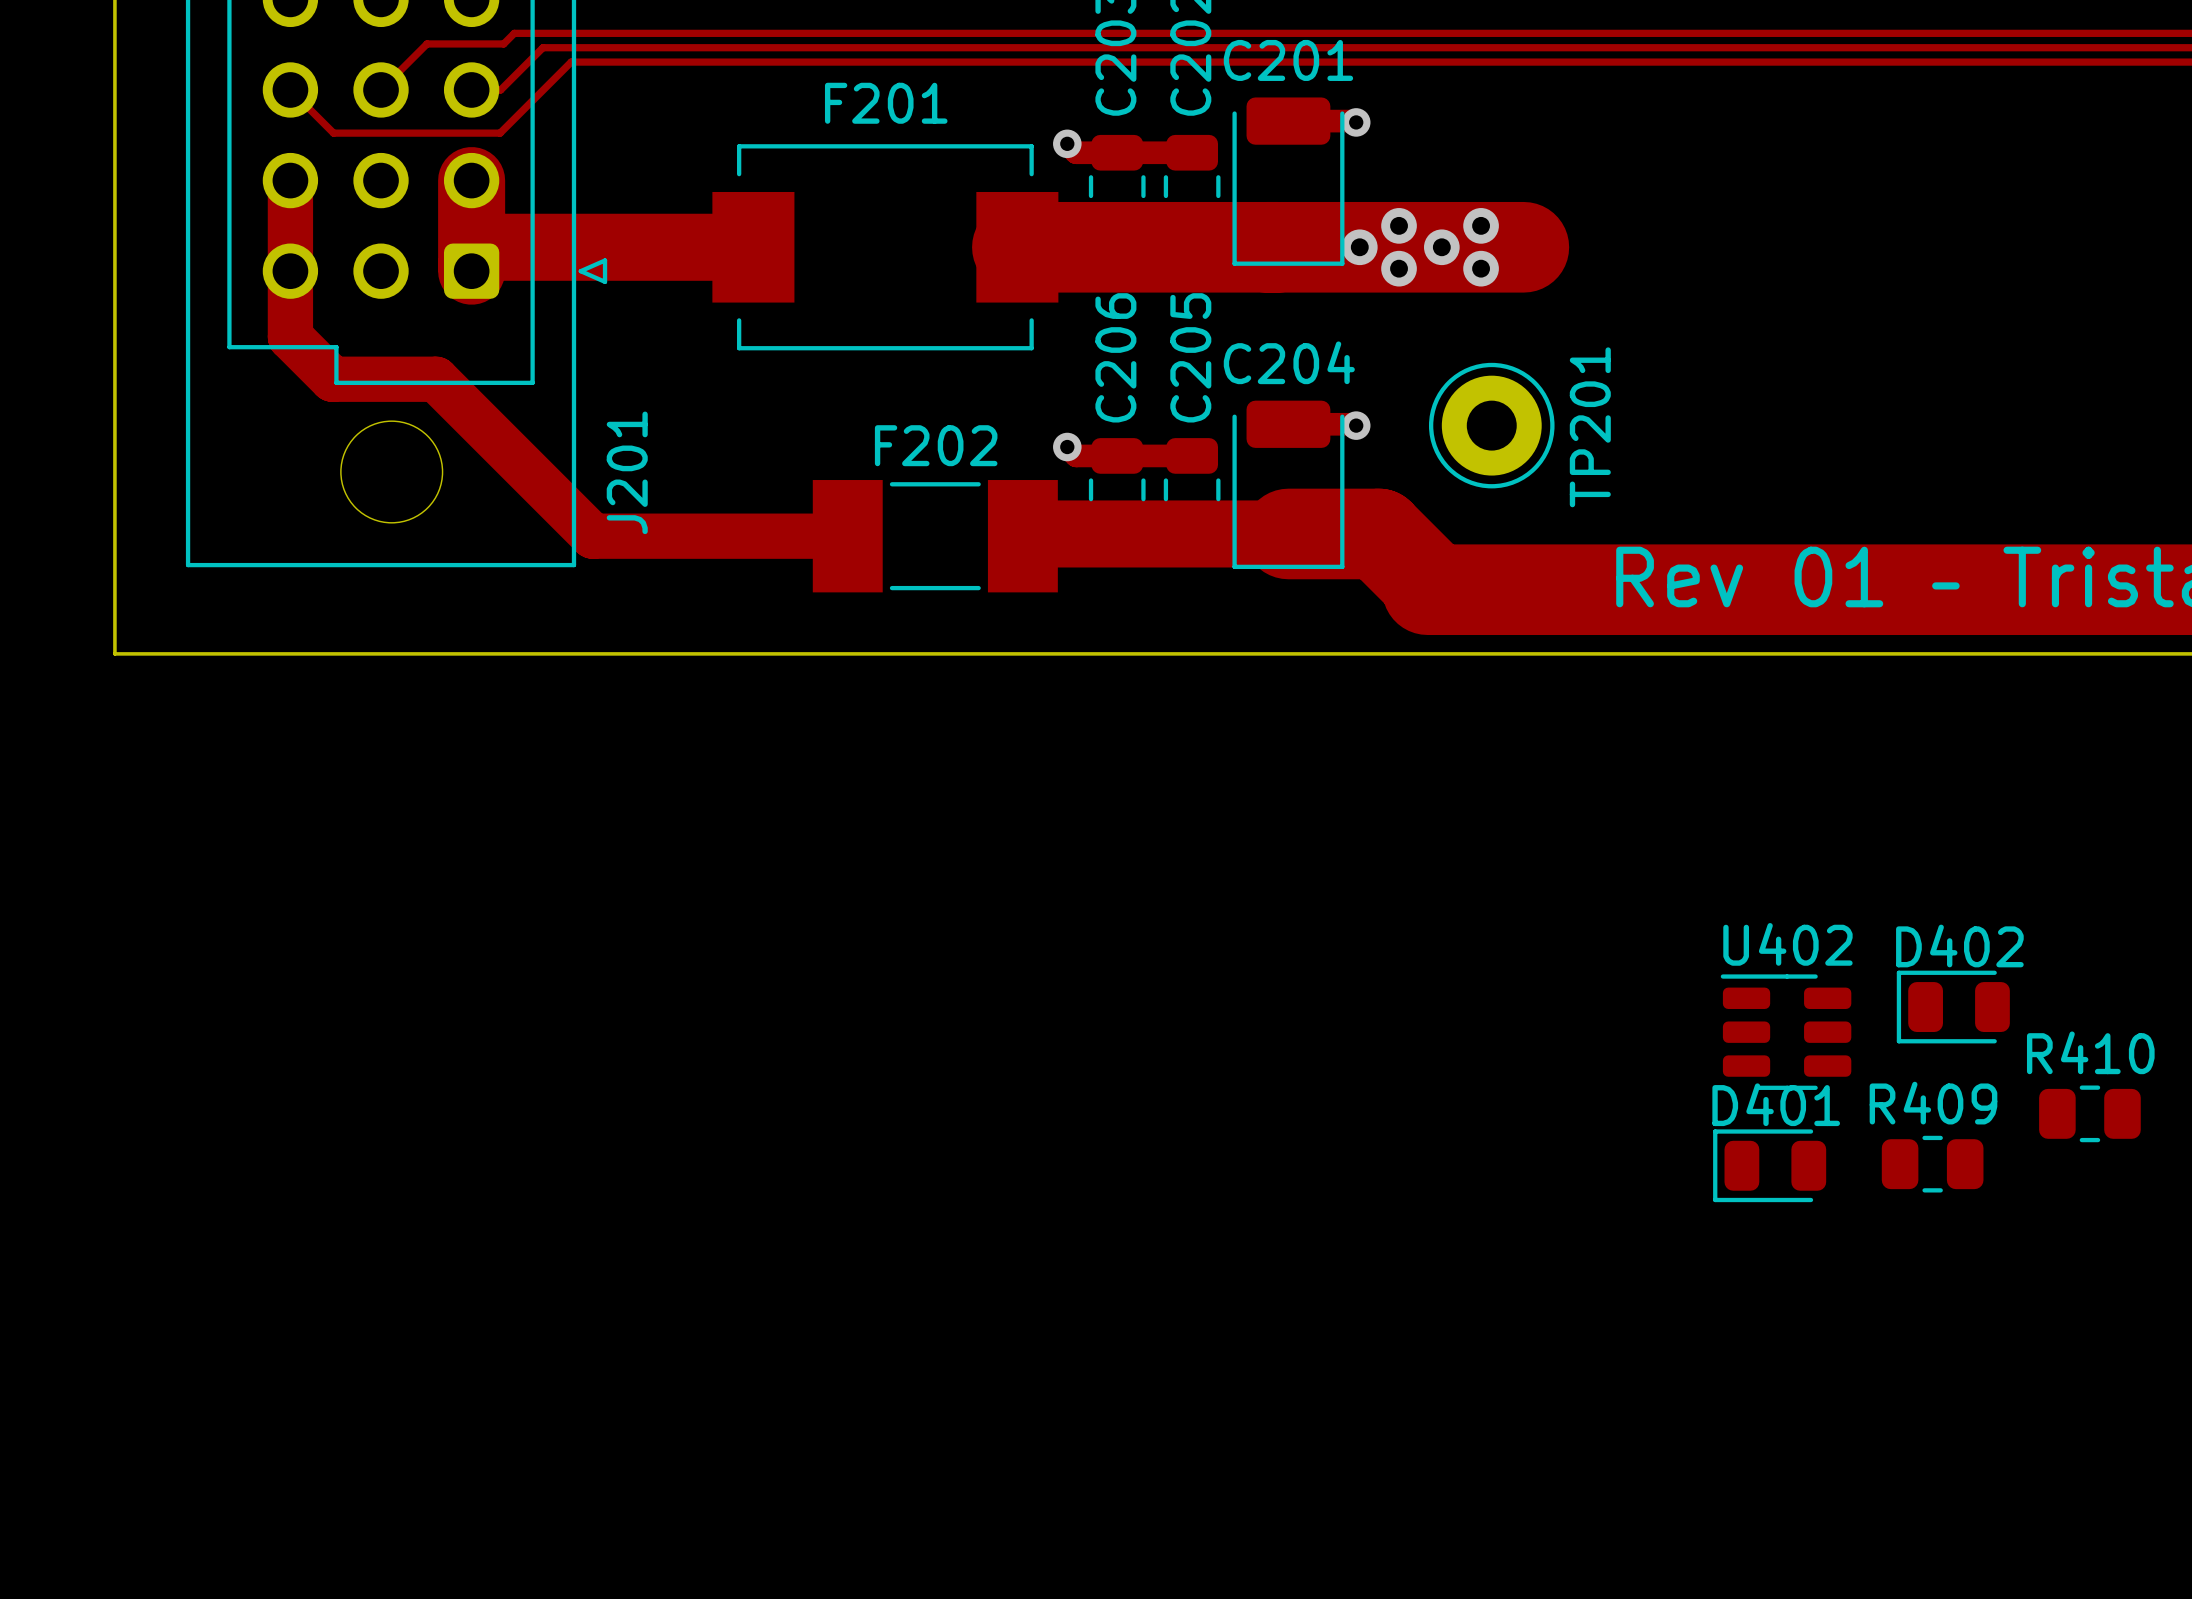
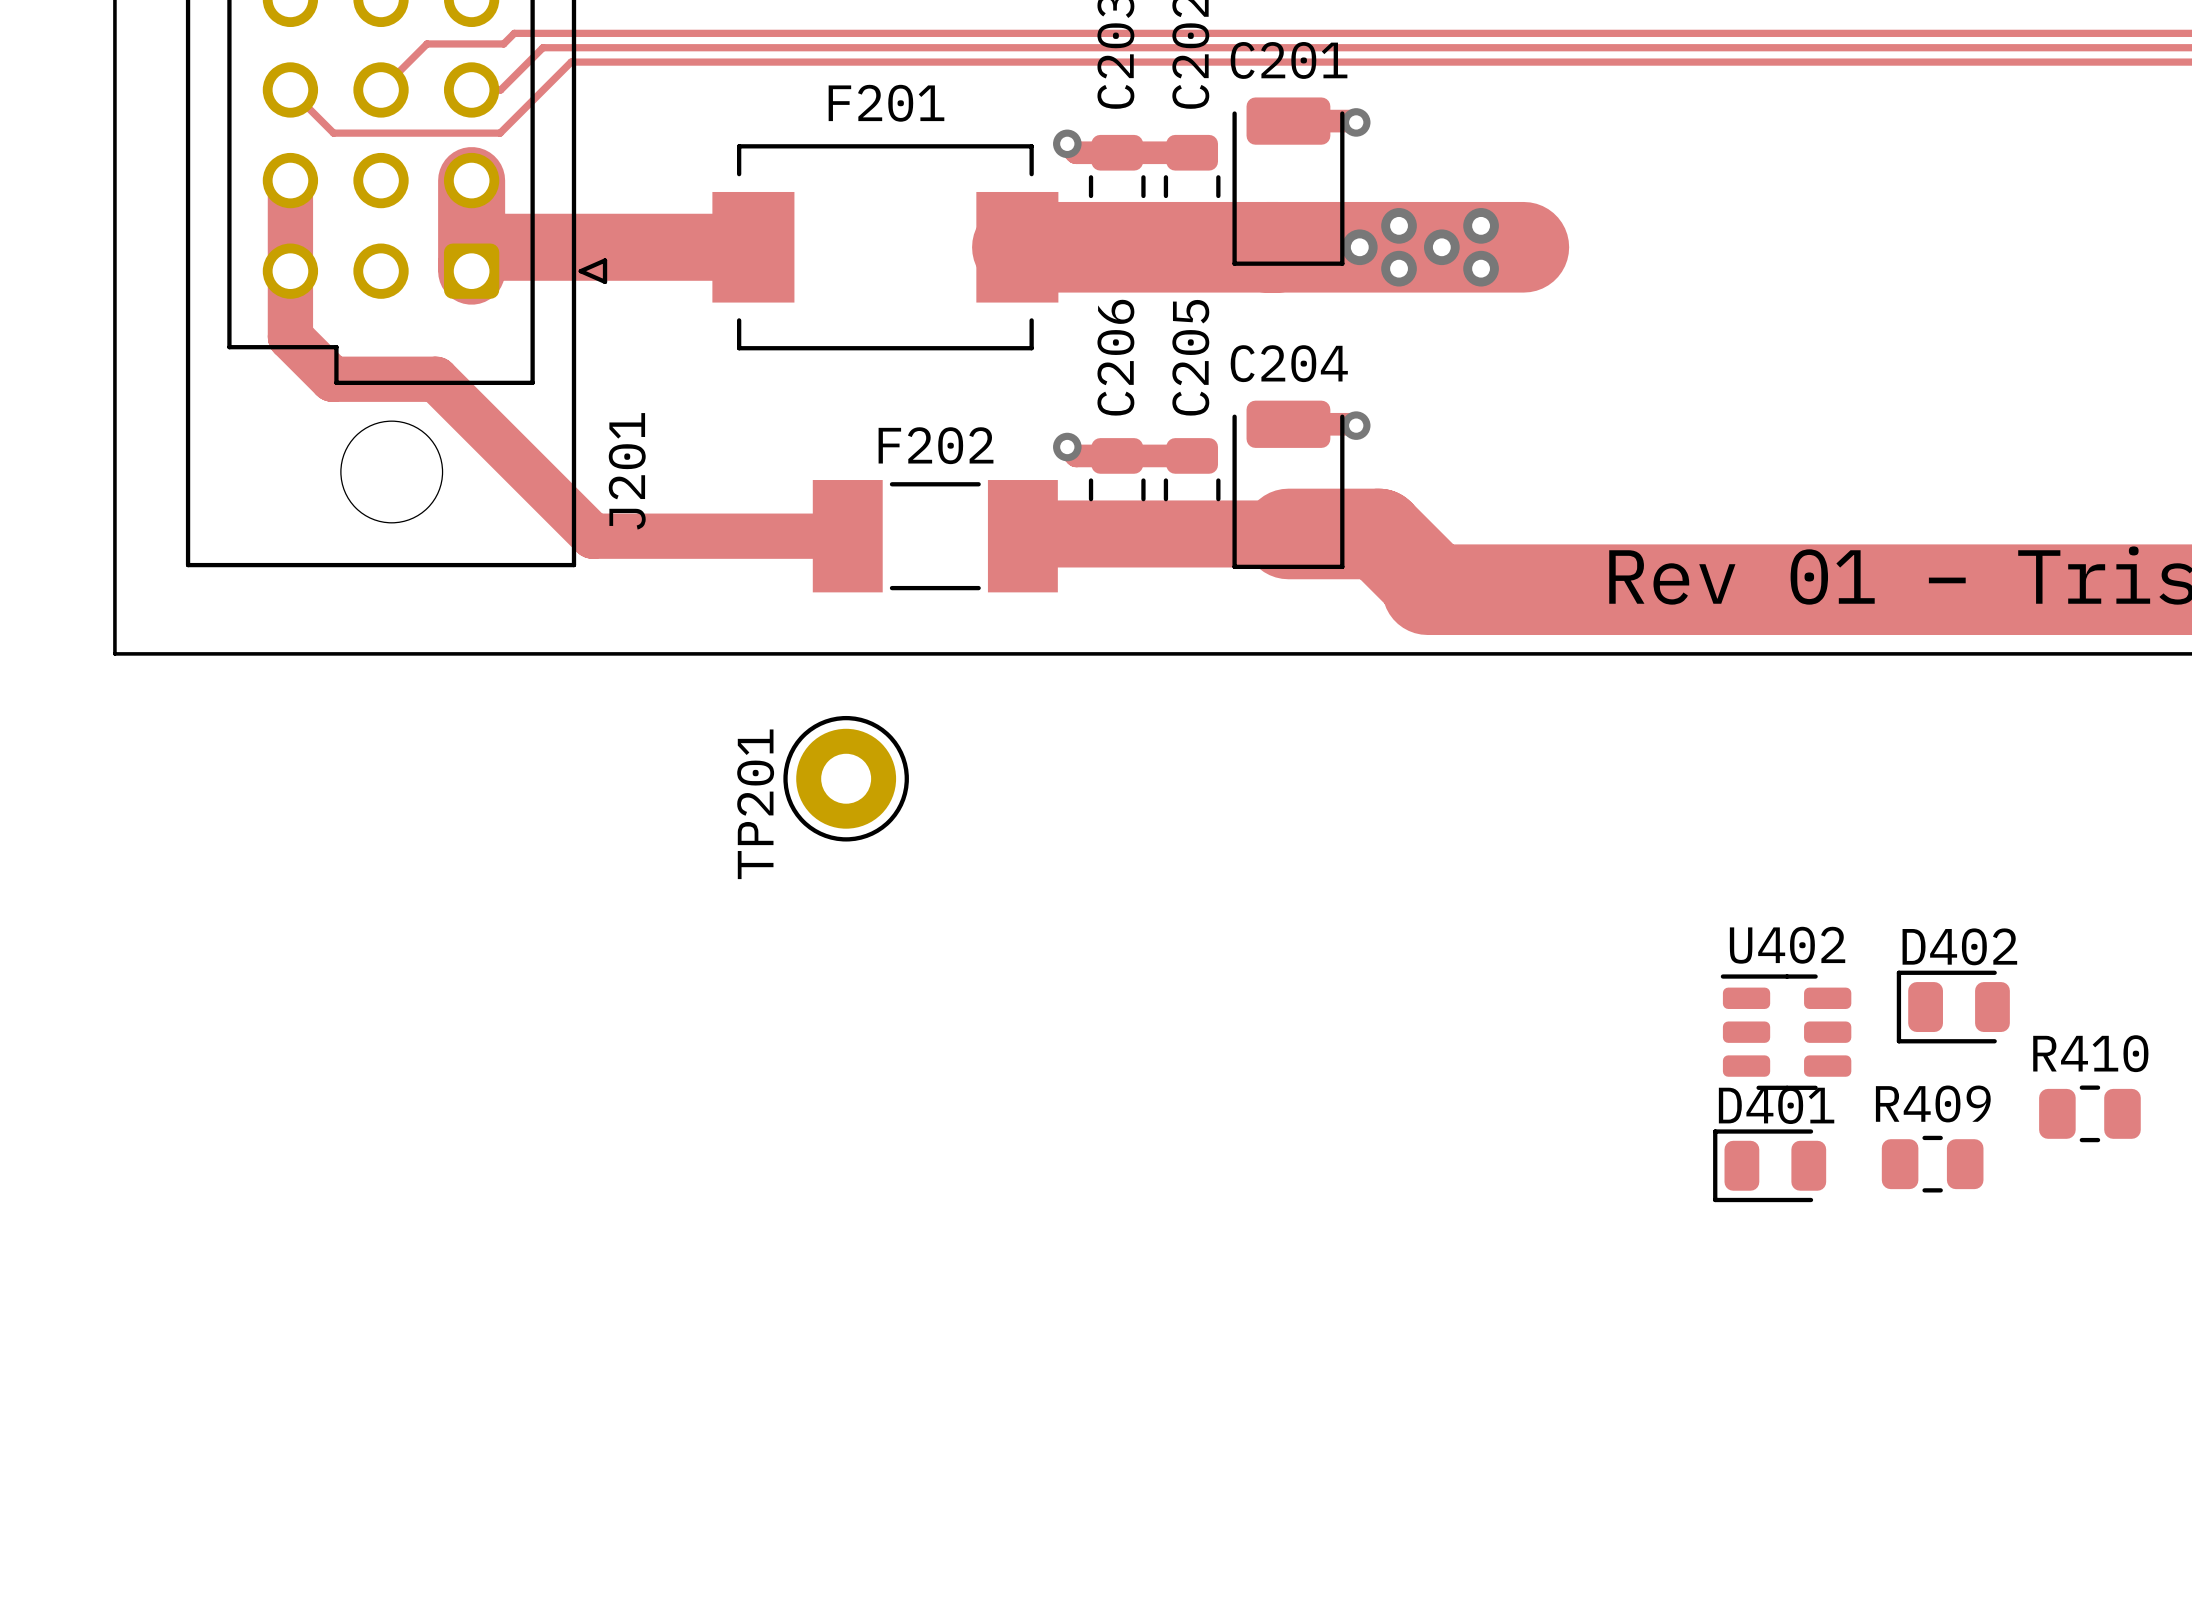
TP201 position: (1491, 425) -> (846, 778)
TP201 name position: TP201 (1590, 427) -> TP201 (755, 804)

